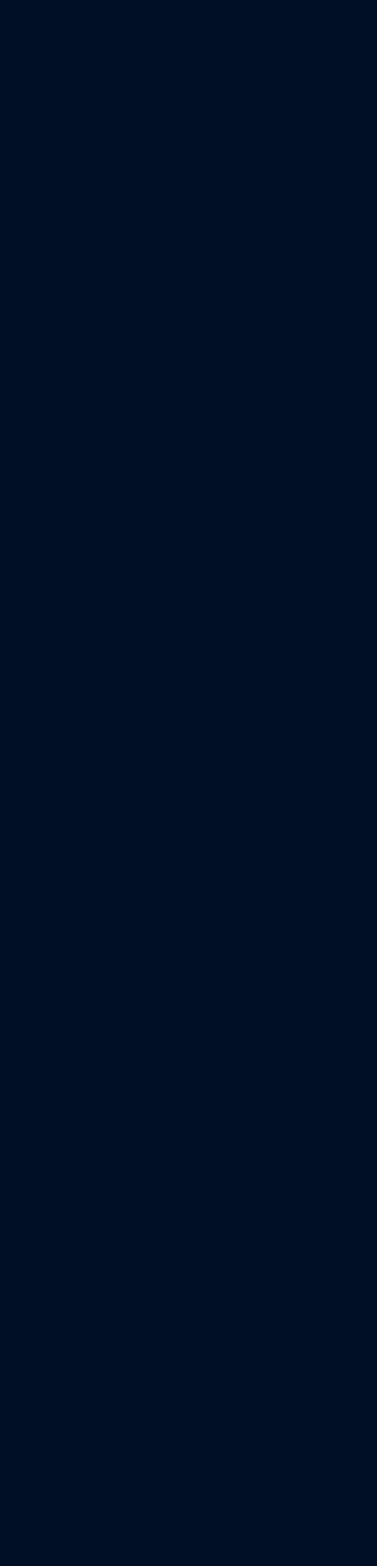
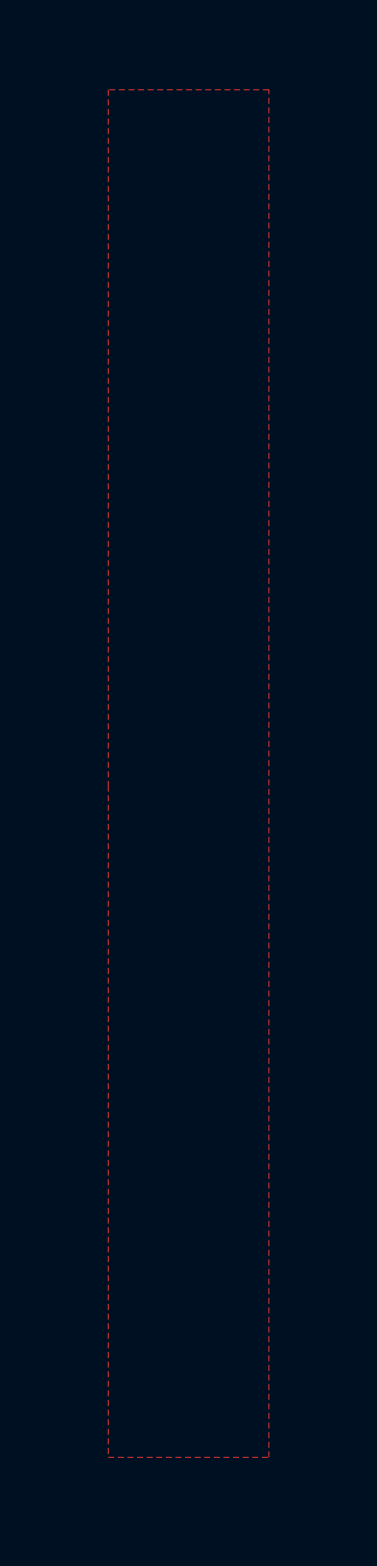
zone outline: none -> (108, 89) (108, 1457) (268, 1457) (268, 89) (108, 89)

